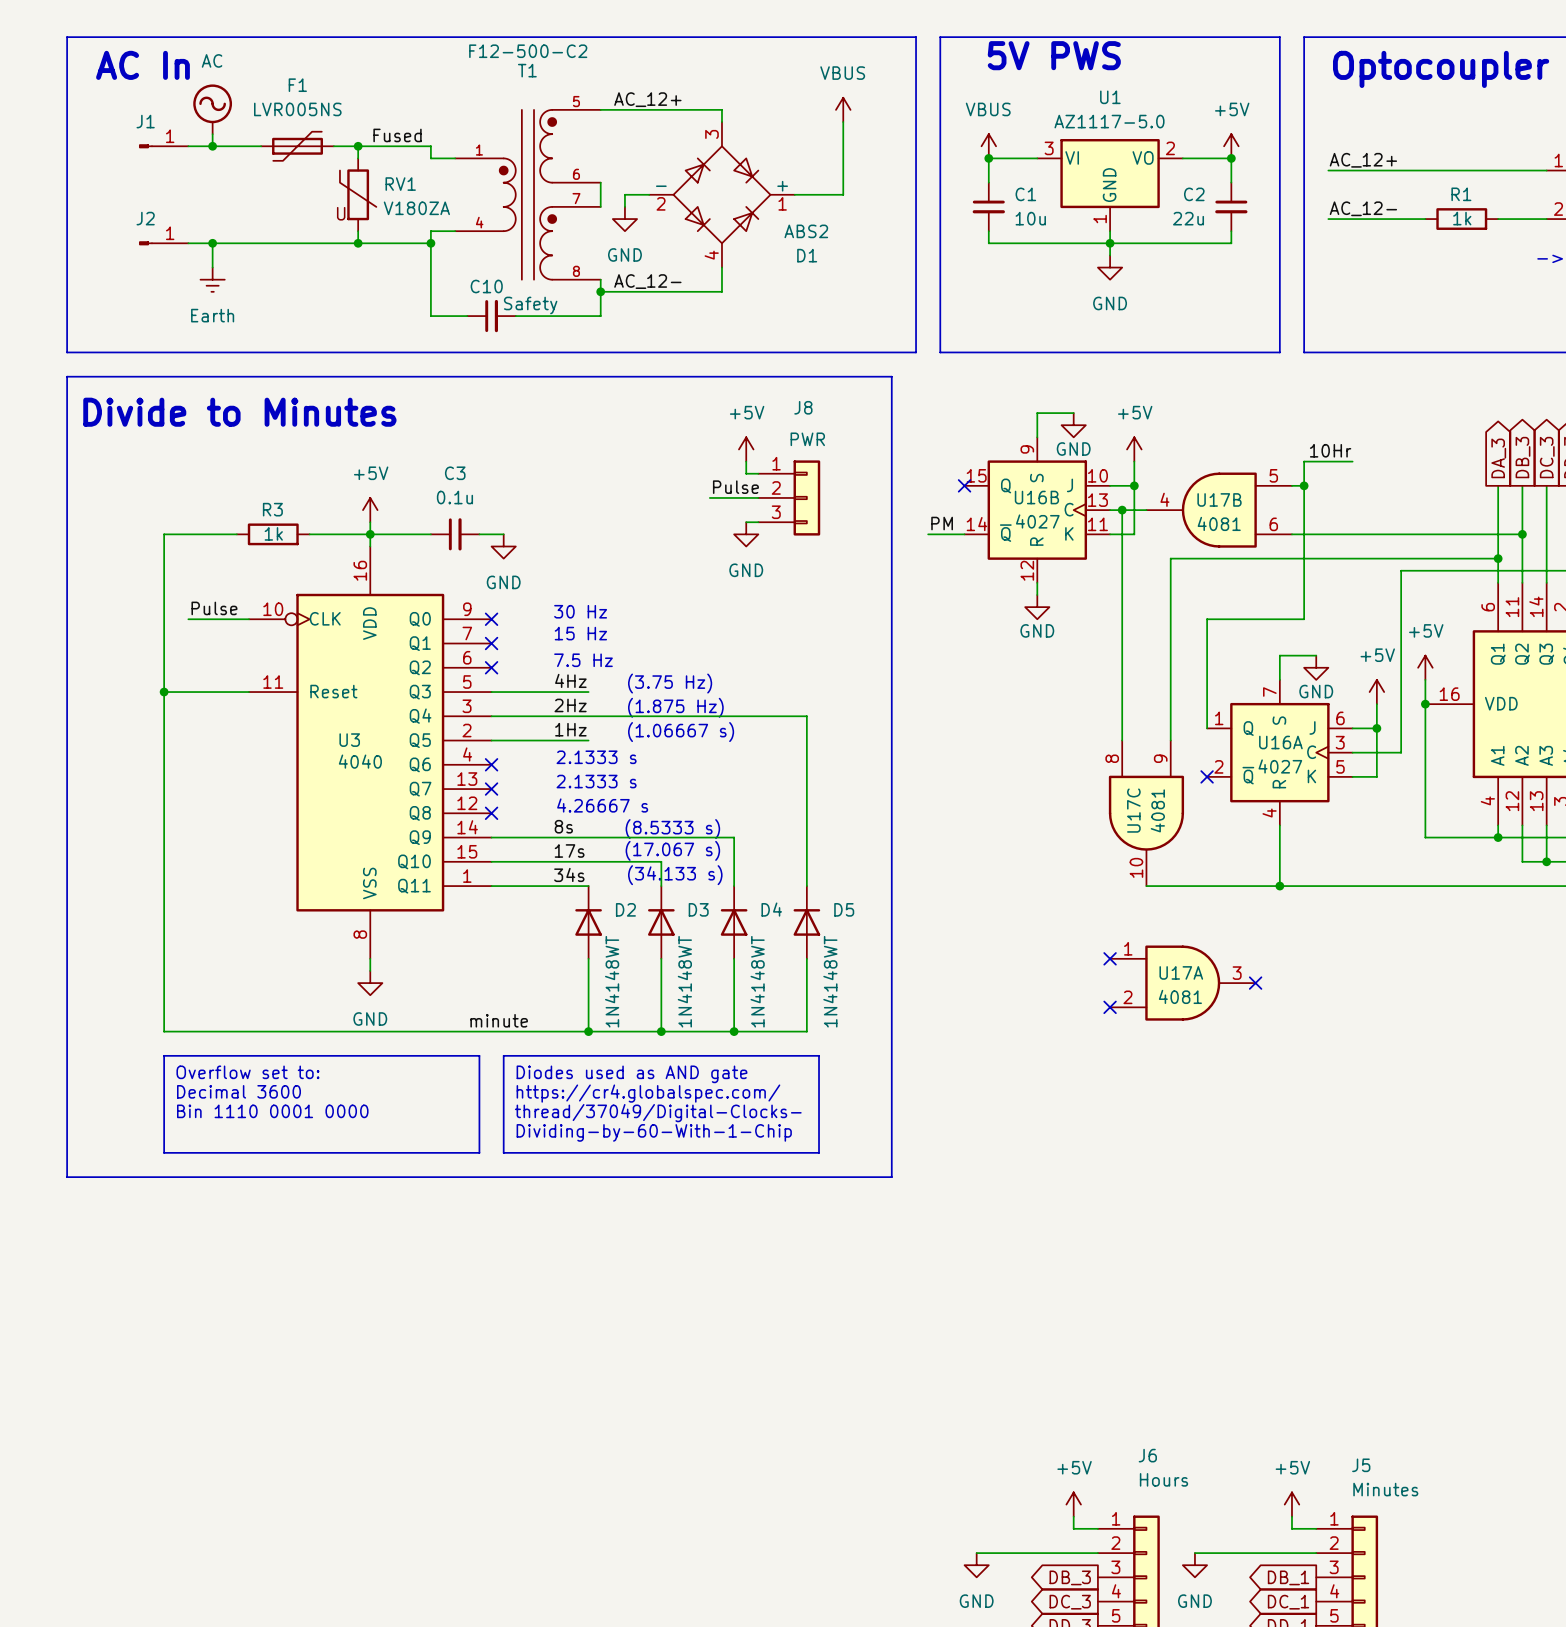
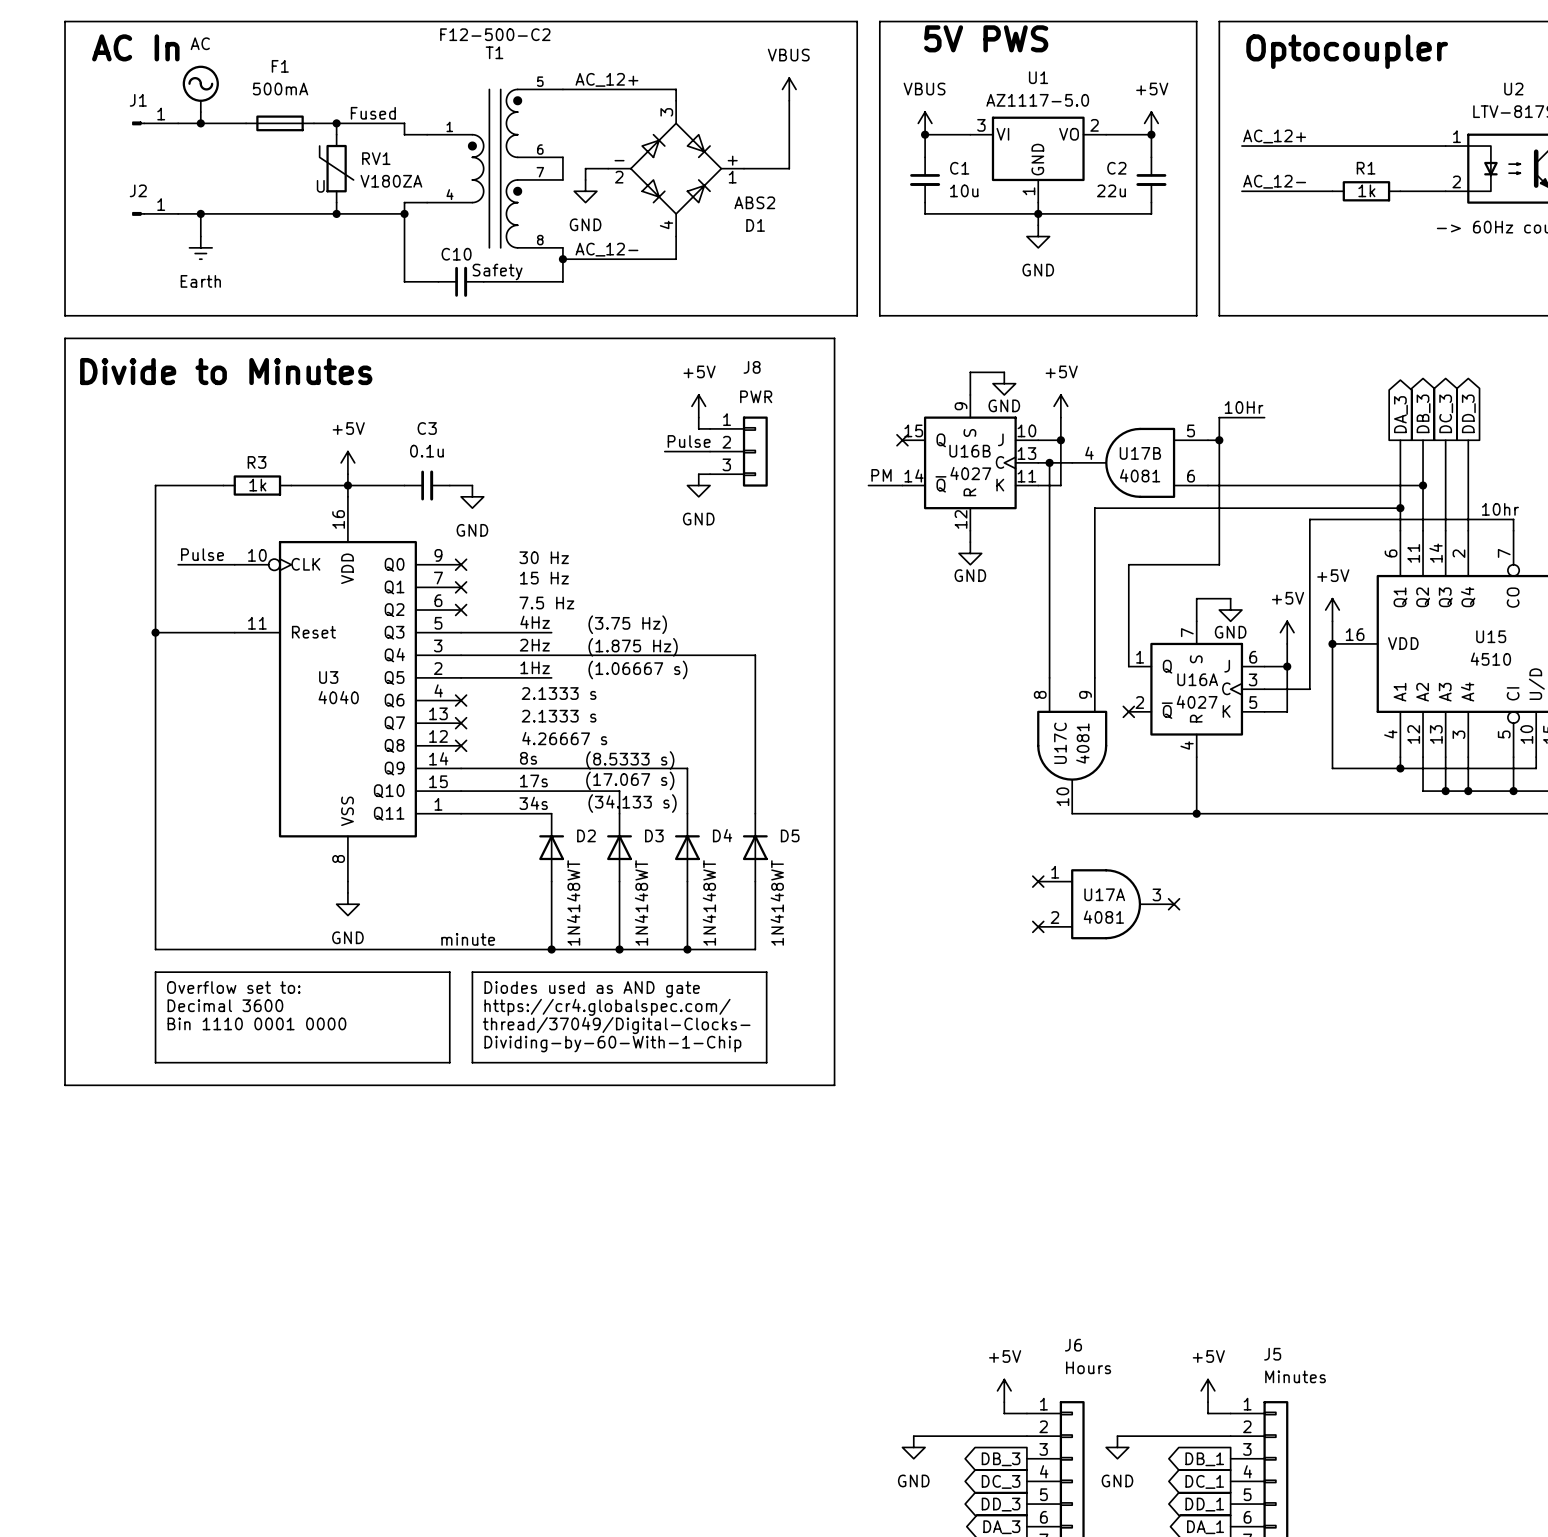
F1 value: LVR005NS (297, 109) -> 500mA (280, 89)
F1 symbol: [261, 131, 334, 161] -> [246, 115, 314, 132]

